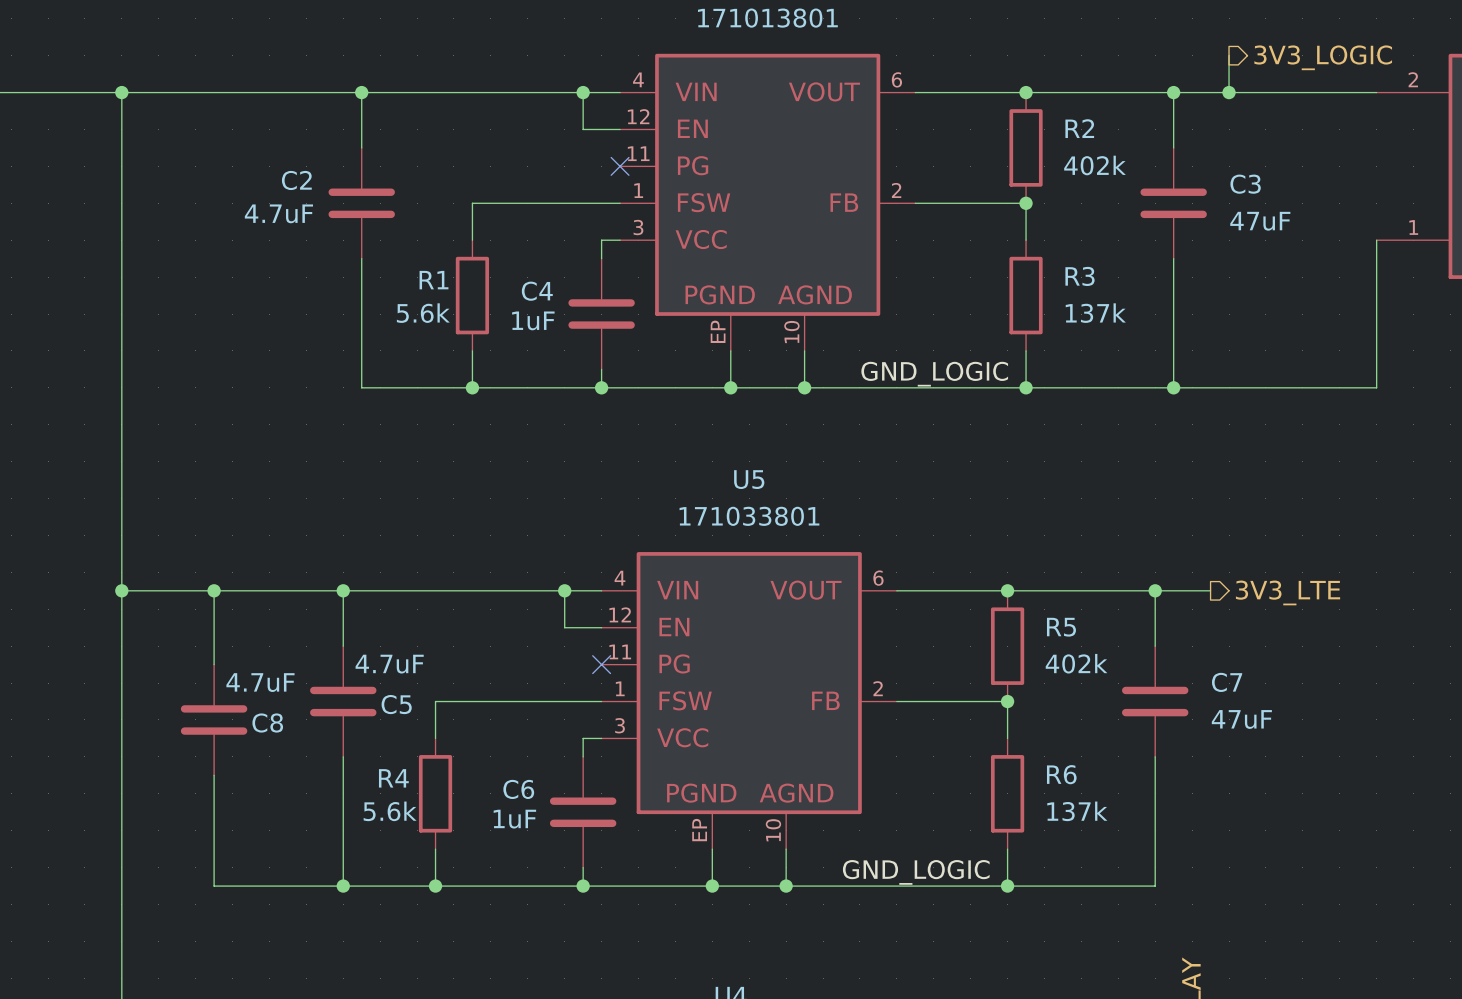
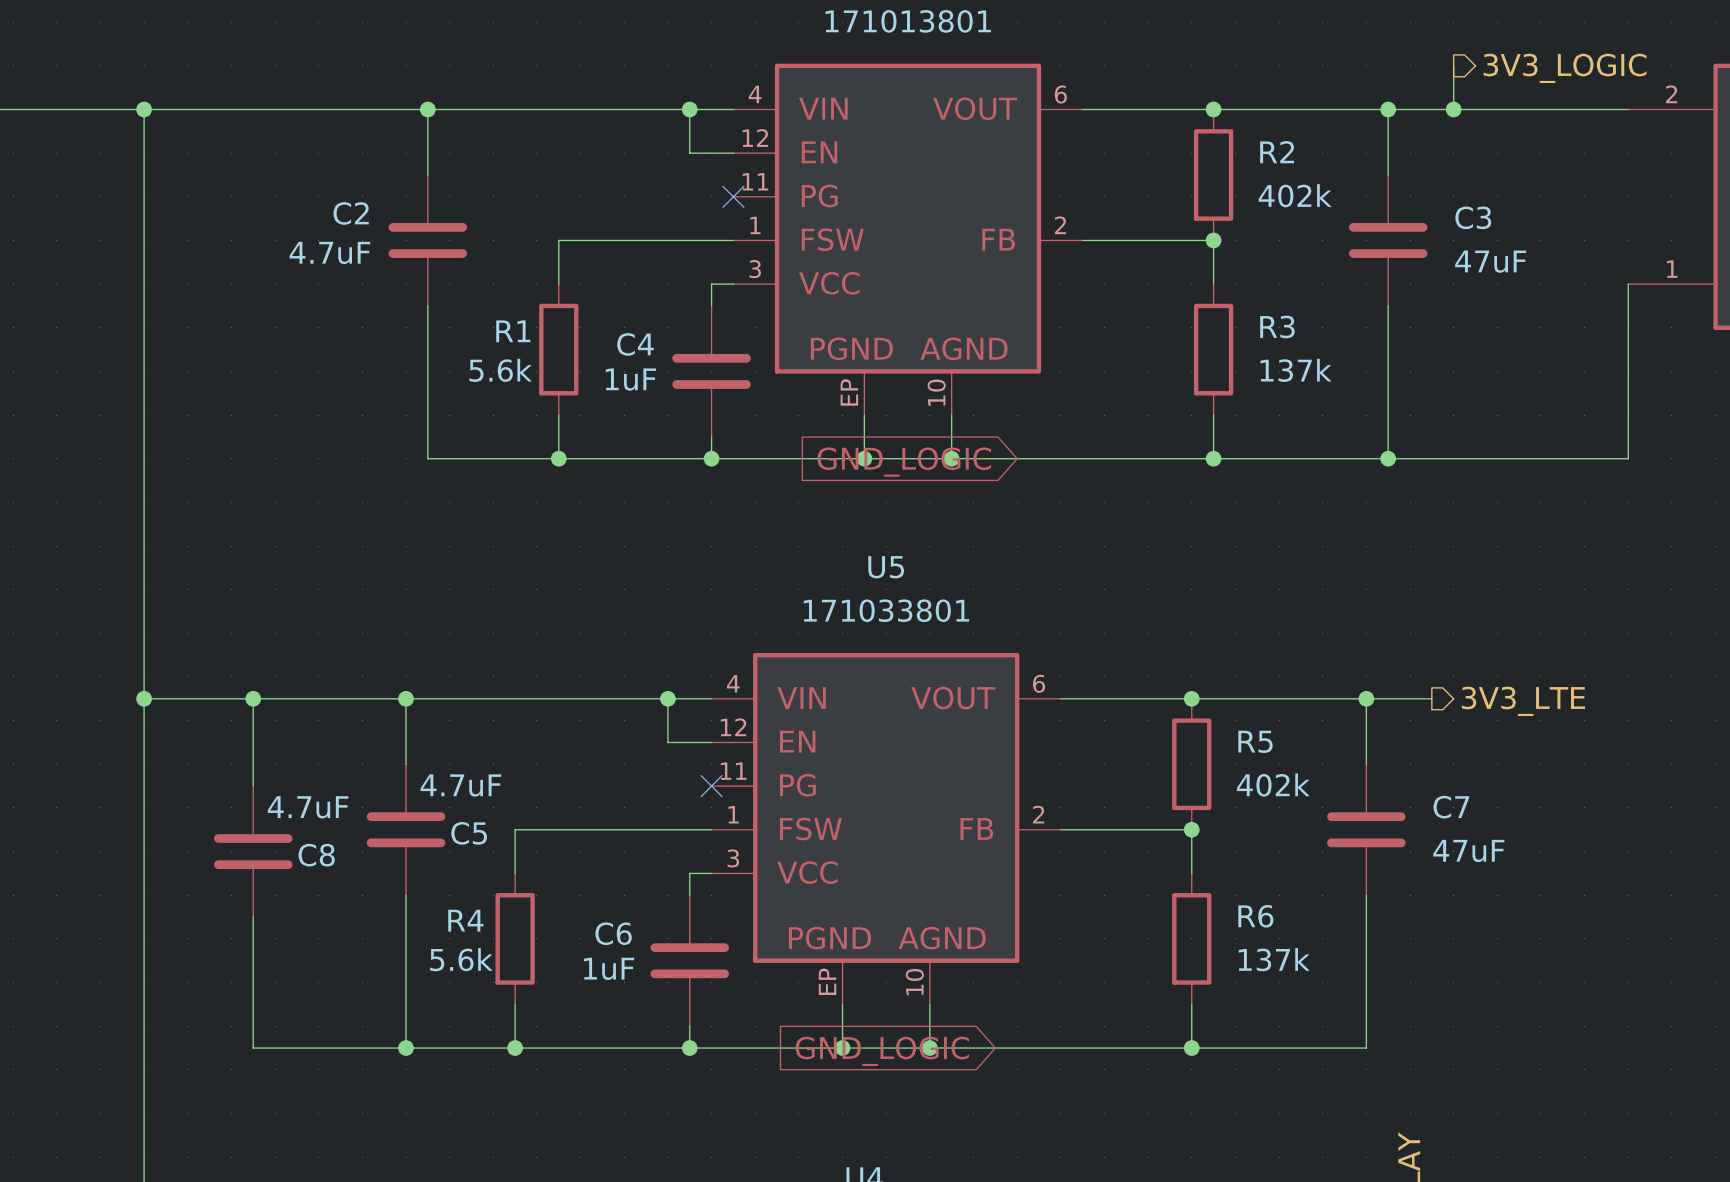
label: GND_LOGIC (934, 374) -> none
global label: none -> GND_LOGIC (904, 462)
label: GND_LOGIC (916, 872) -> none
global label: none -> GND_LOGIC (882, 1051)

